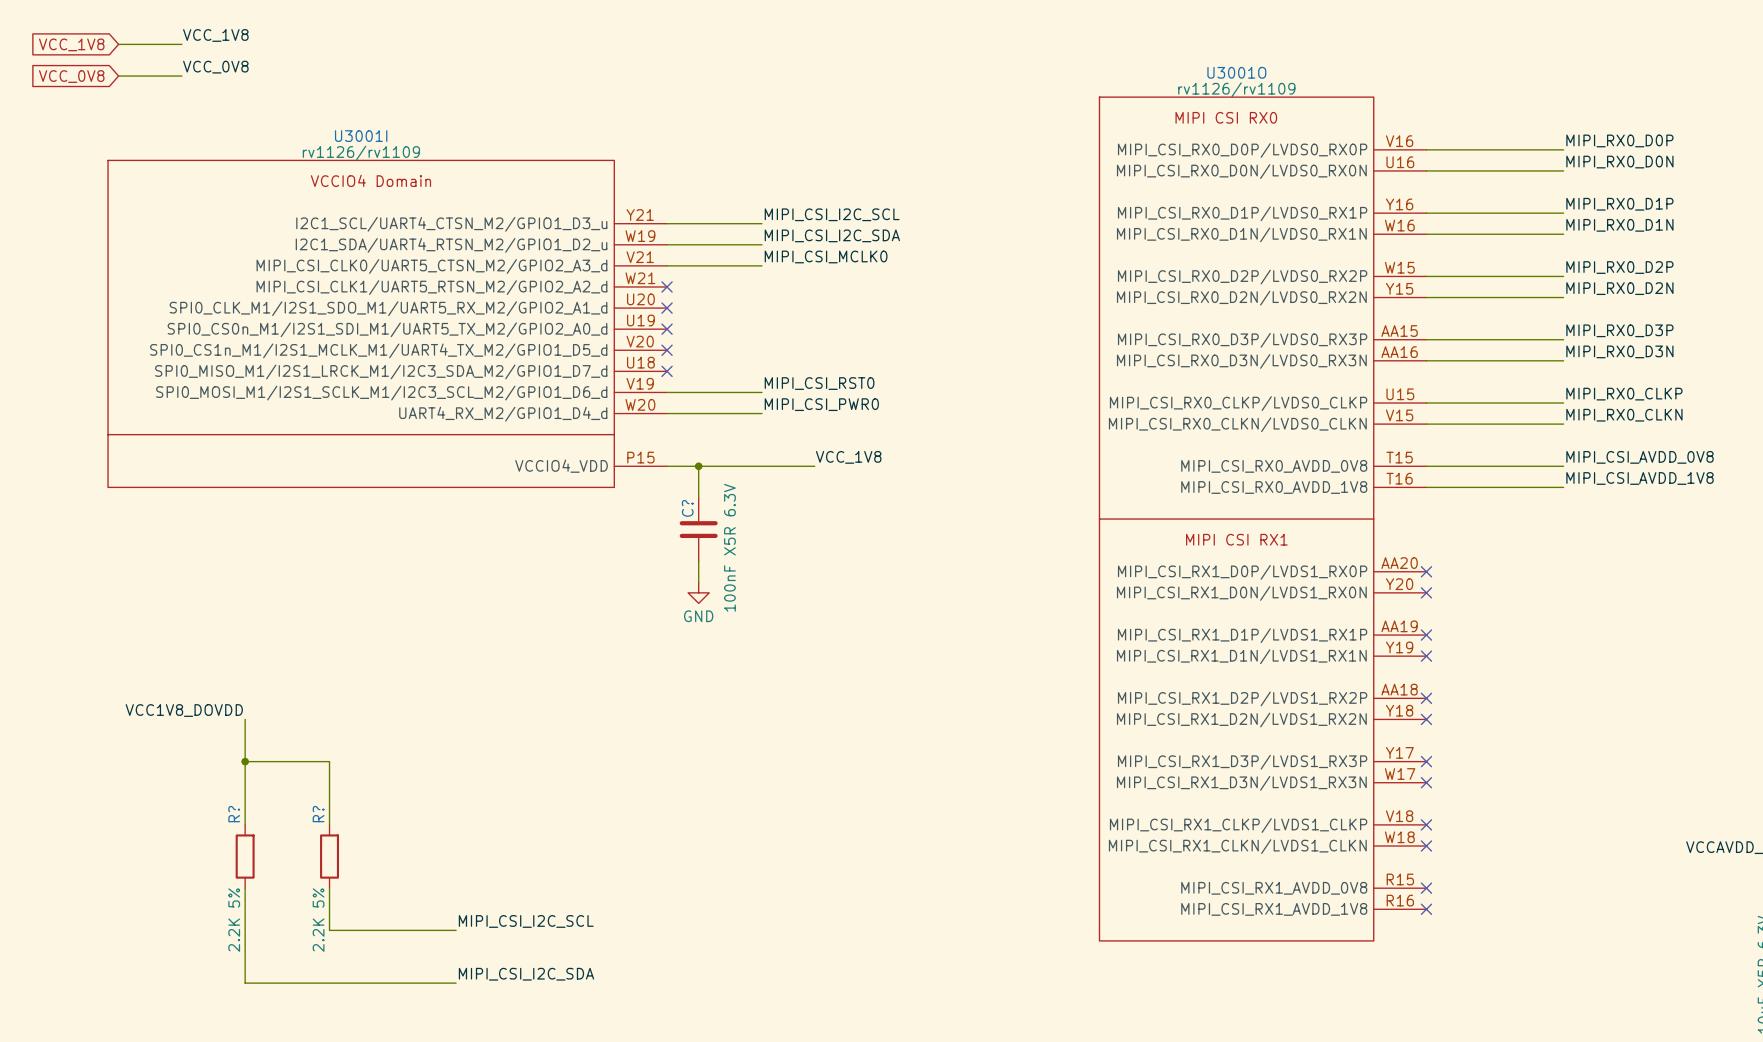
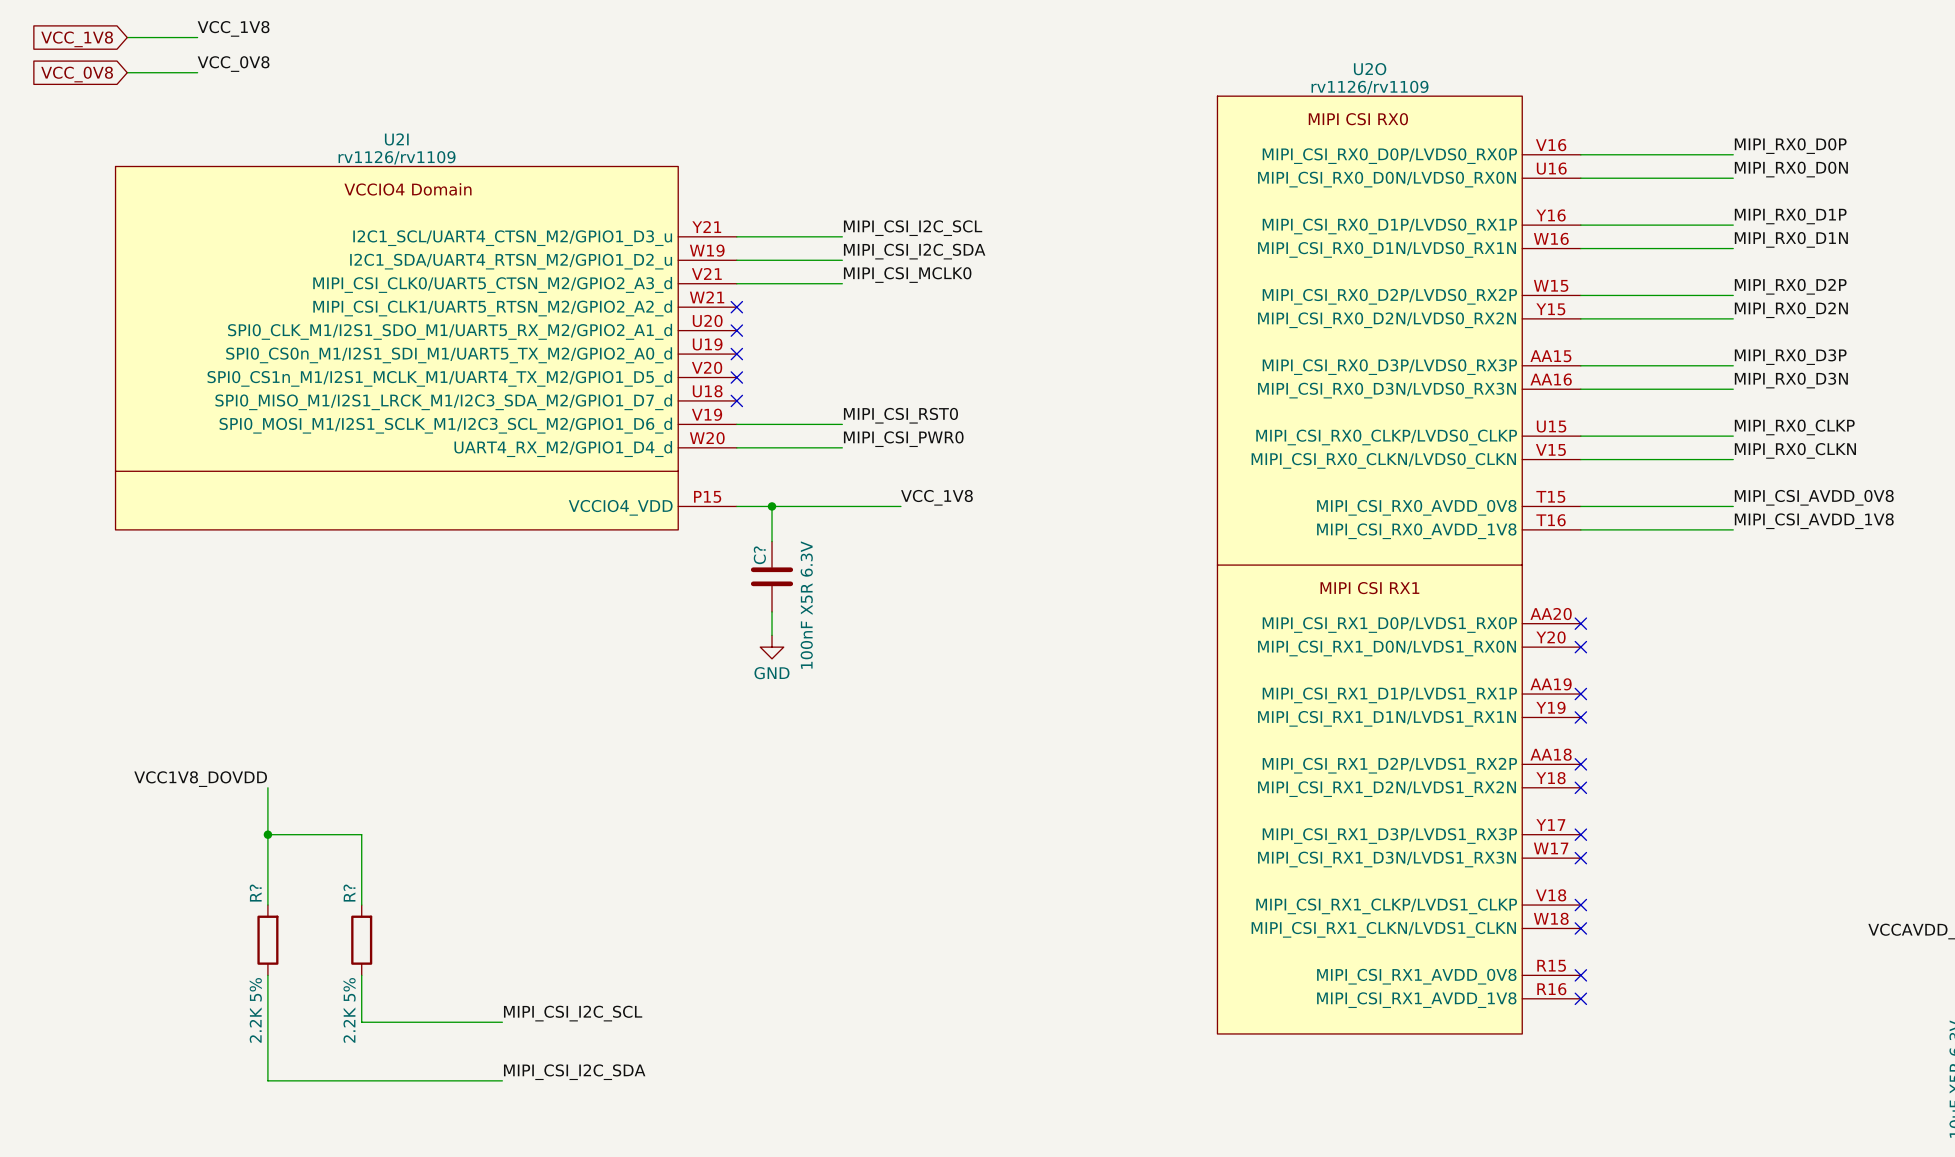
U3001I: rv1126/rv1109 (387, 323) -> none
U2I: none -> rv1126/rv1109 (426, 348)
U3001O: rv1126/rv1109 (1262, 519) -> none
U2O: none -> rv1126/rv1109 (1399, 565)

